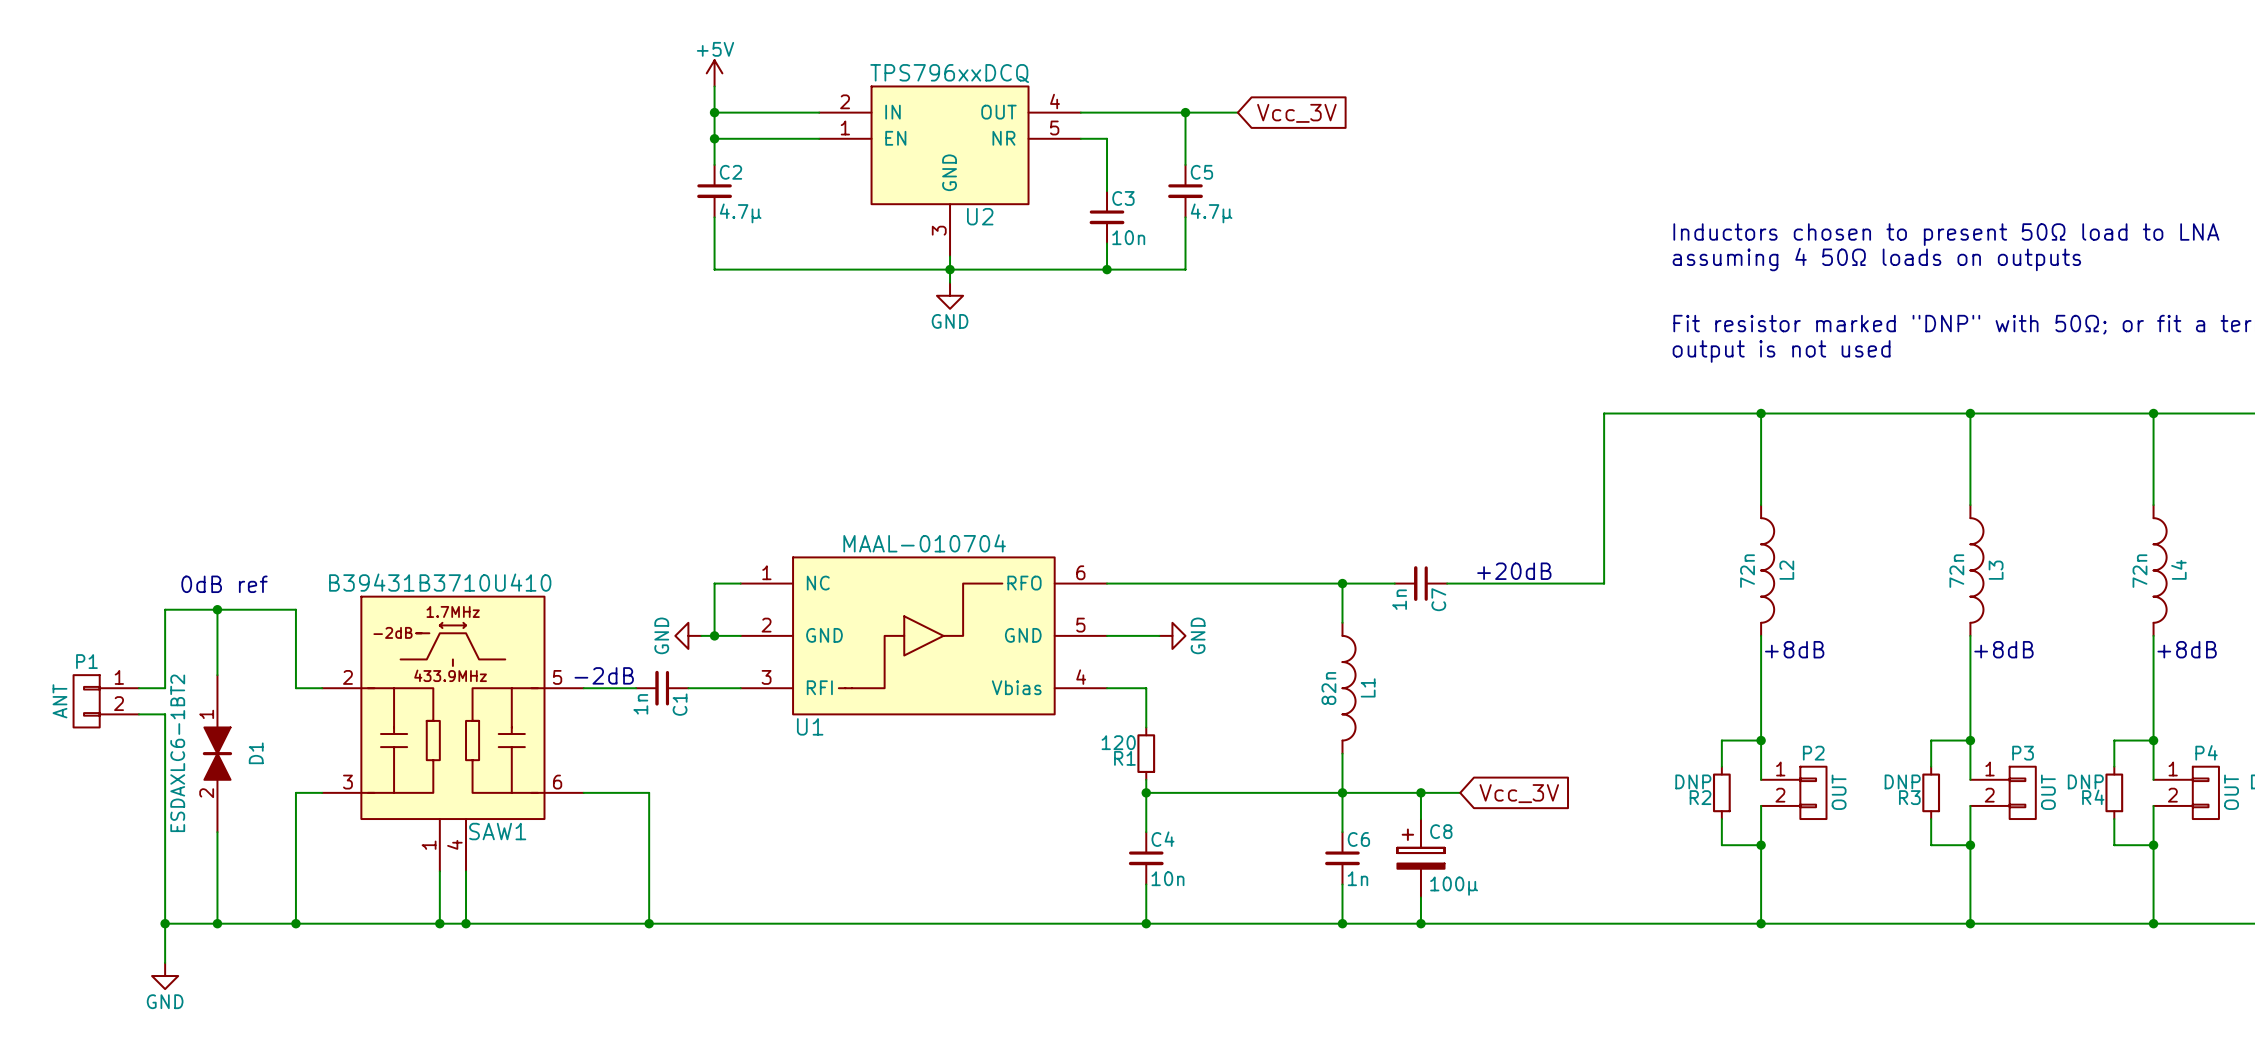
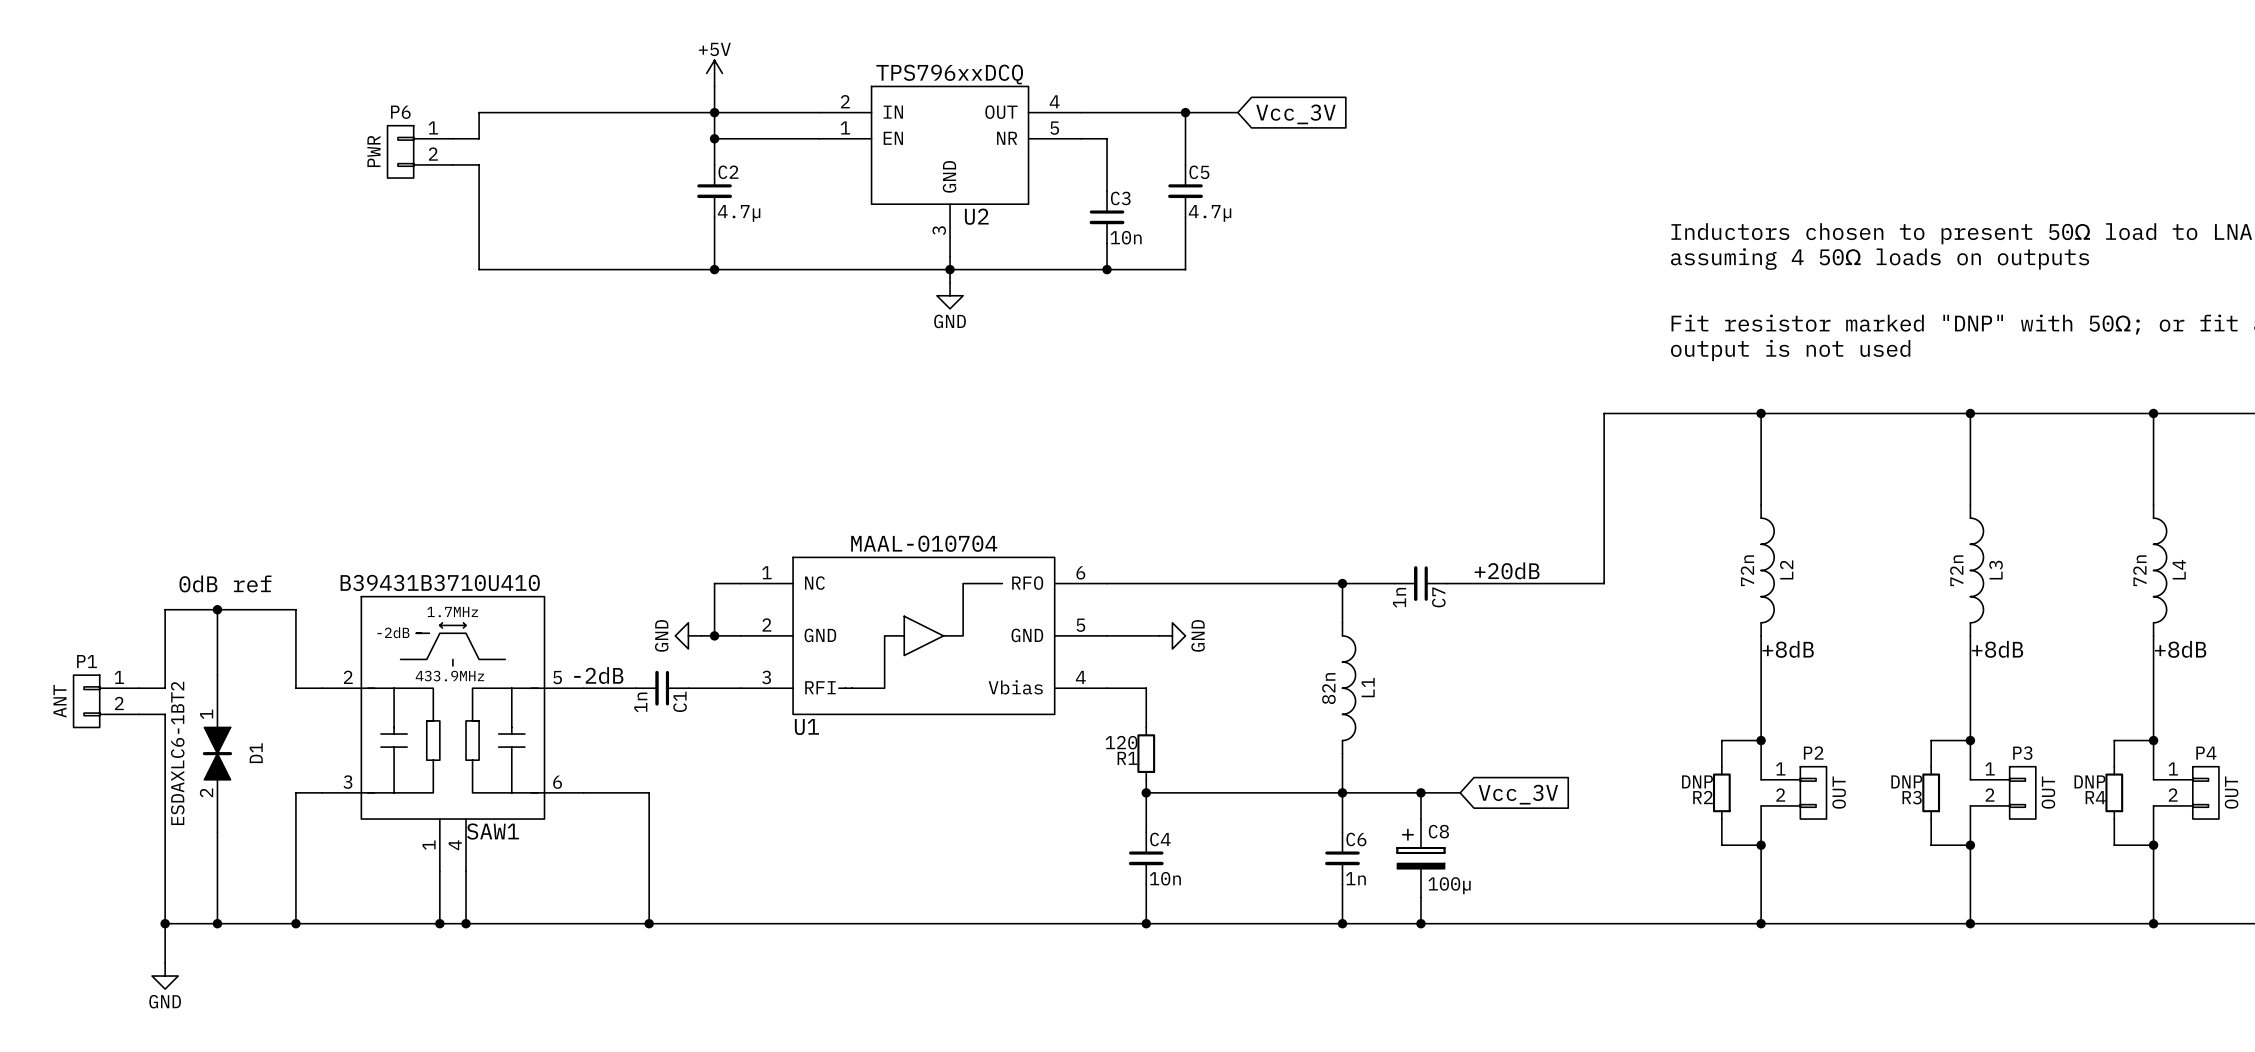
wire: none -> (714, 112) (479, 112) (479, 138) (452, 138)
P6: none -> PWR (420, 151)
wire: none -> (452, 164) (479, 164) (479, 269) (714, 269)
junction: none -> (714, 269)

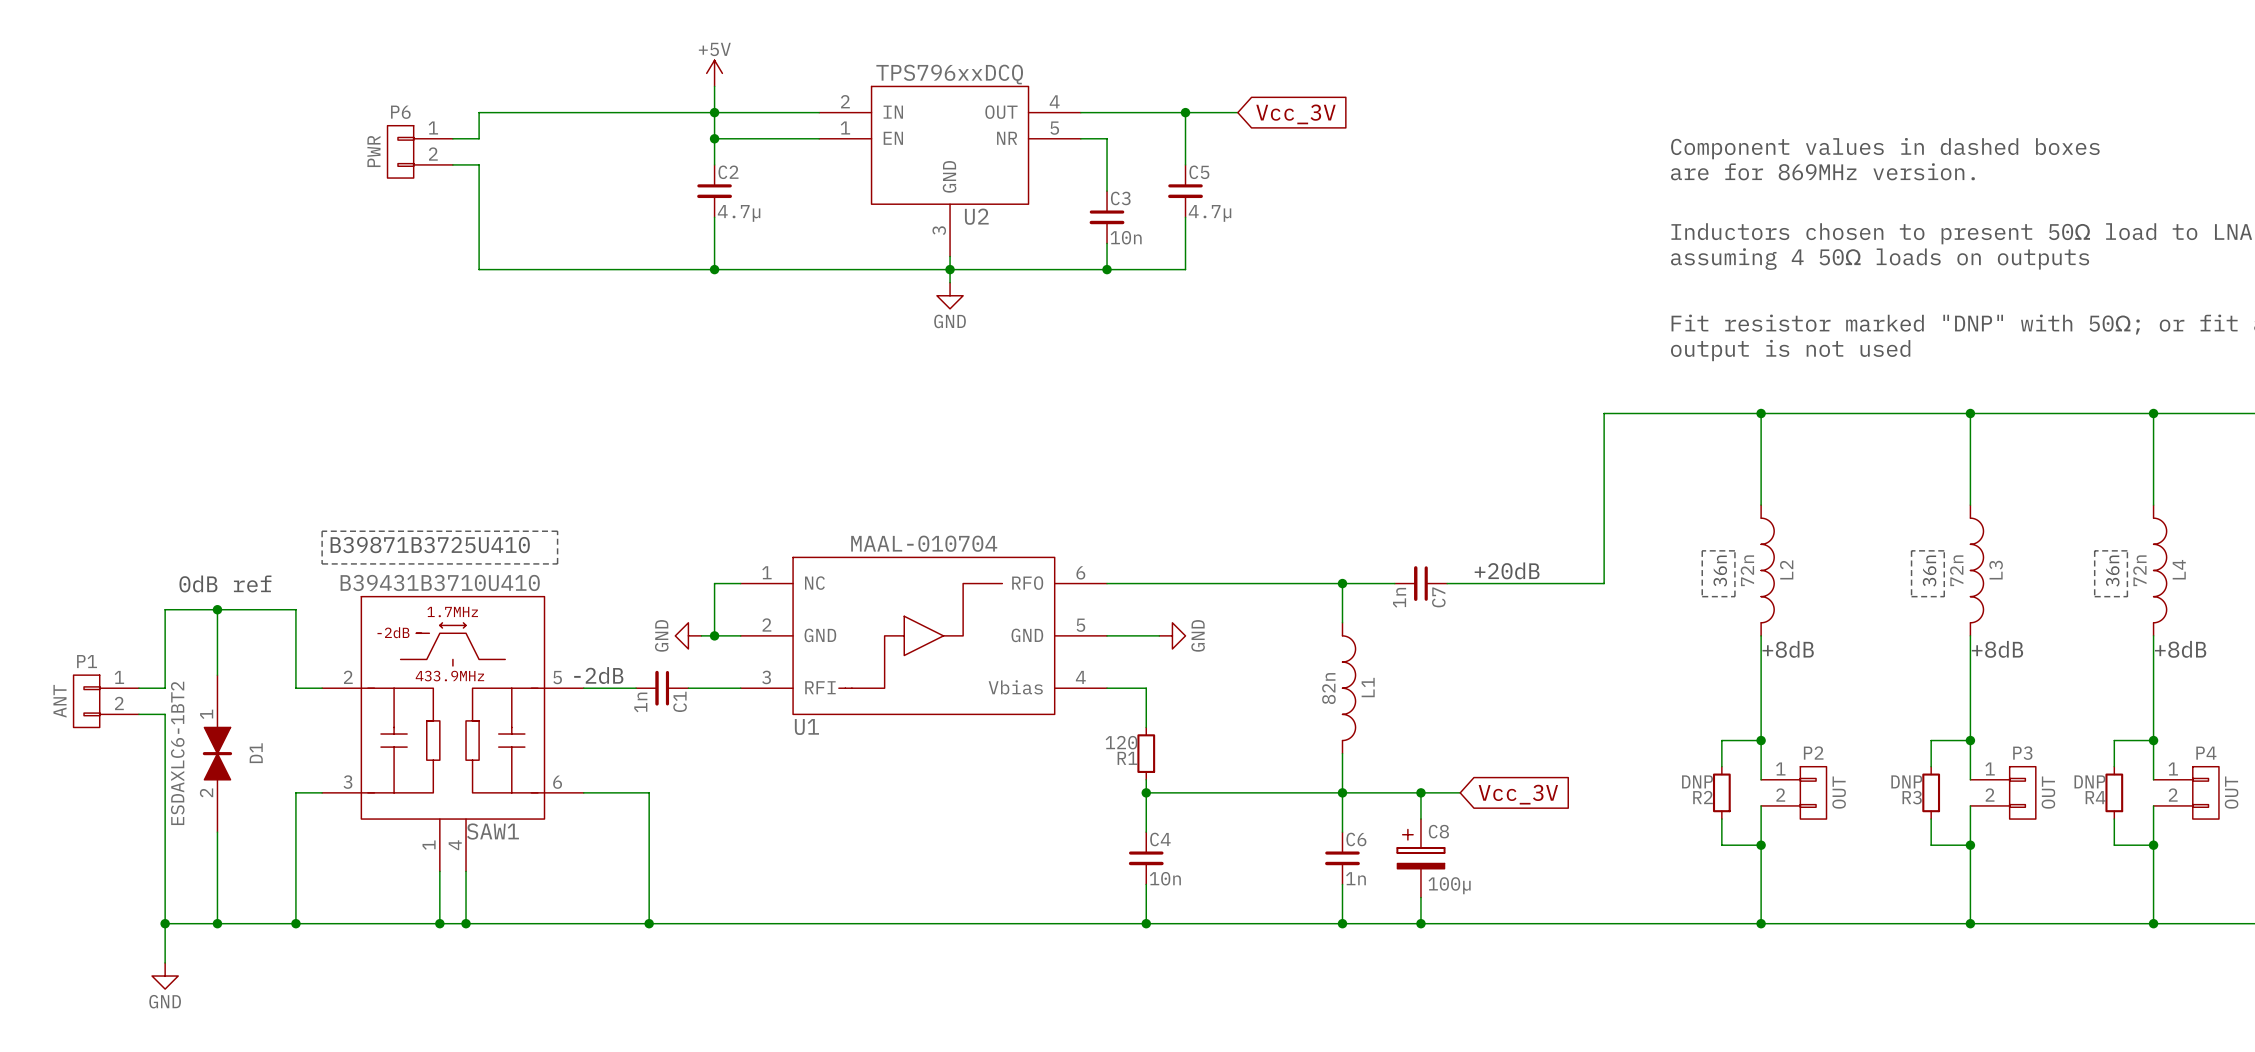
text: none -> Component values in dashed boxes (1885, 148)
text: none -> are for 869MHz version. (1822, 171)
line: none -> (322, 531) (557, 531) (557, 563) (322, 563) (322, 531)
text: none -> B39871B3725U410 (430, 545)
line: none -> (1702, 550) (1734, 550) (1734, 596) (1702, 596) (1702, 550)
line: none -> (1911, 550) (1944, 550) (1944, 596) (1911, 596) (1911, 550)
line: none -> (2094, 550) (2127, 550) (2127, 596) (2094, 596) (2094, 550)
text: none -> 36n (1720, 571)
text: none -> 36n (1929, 571)
text: none -> 36n (2112, 571)

